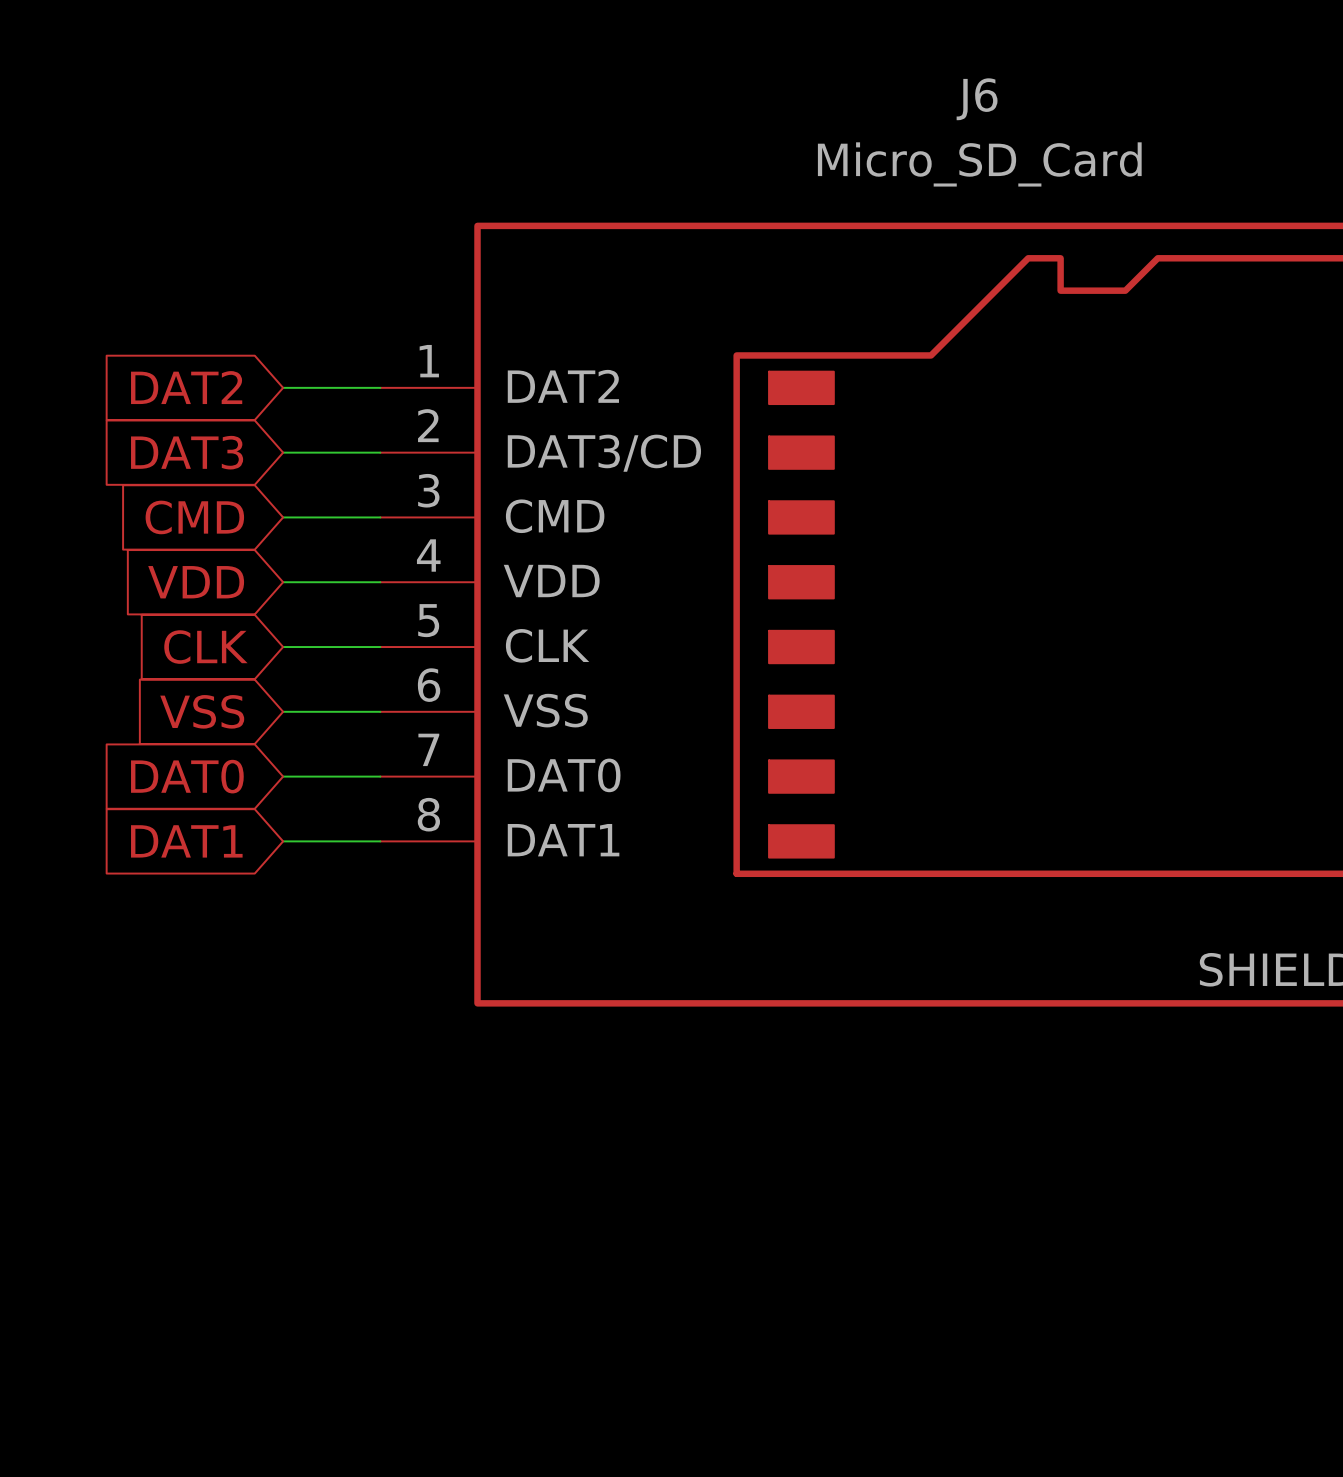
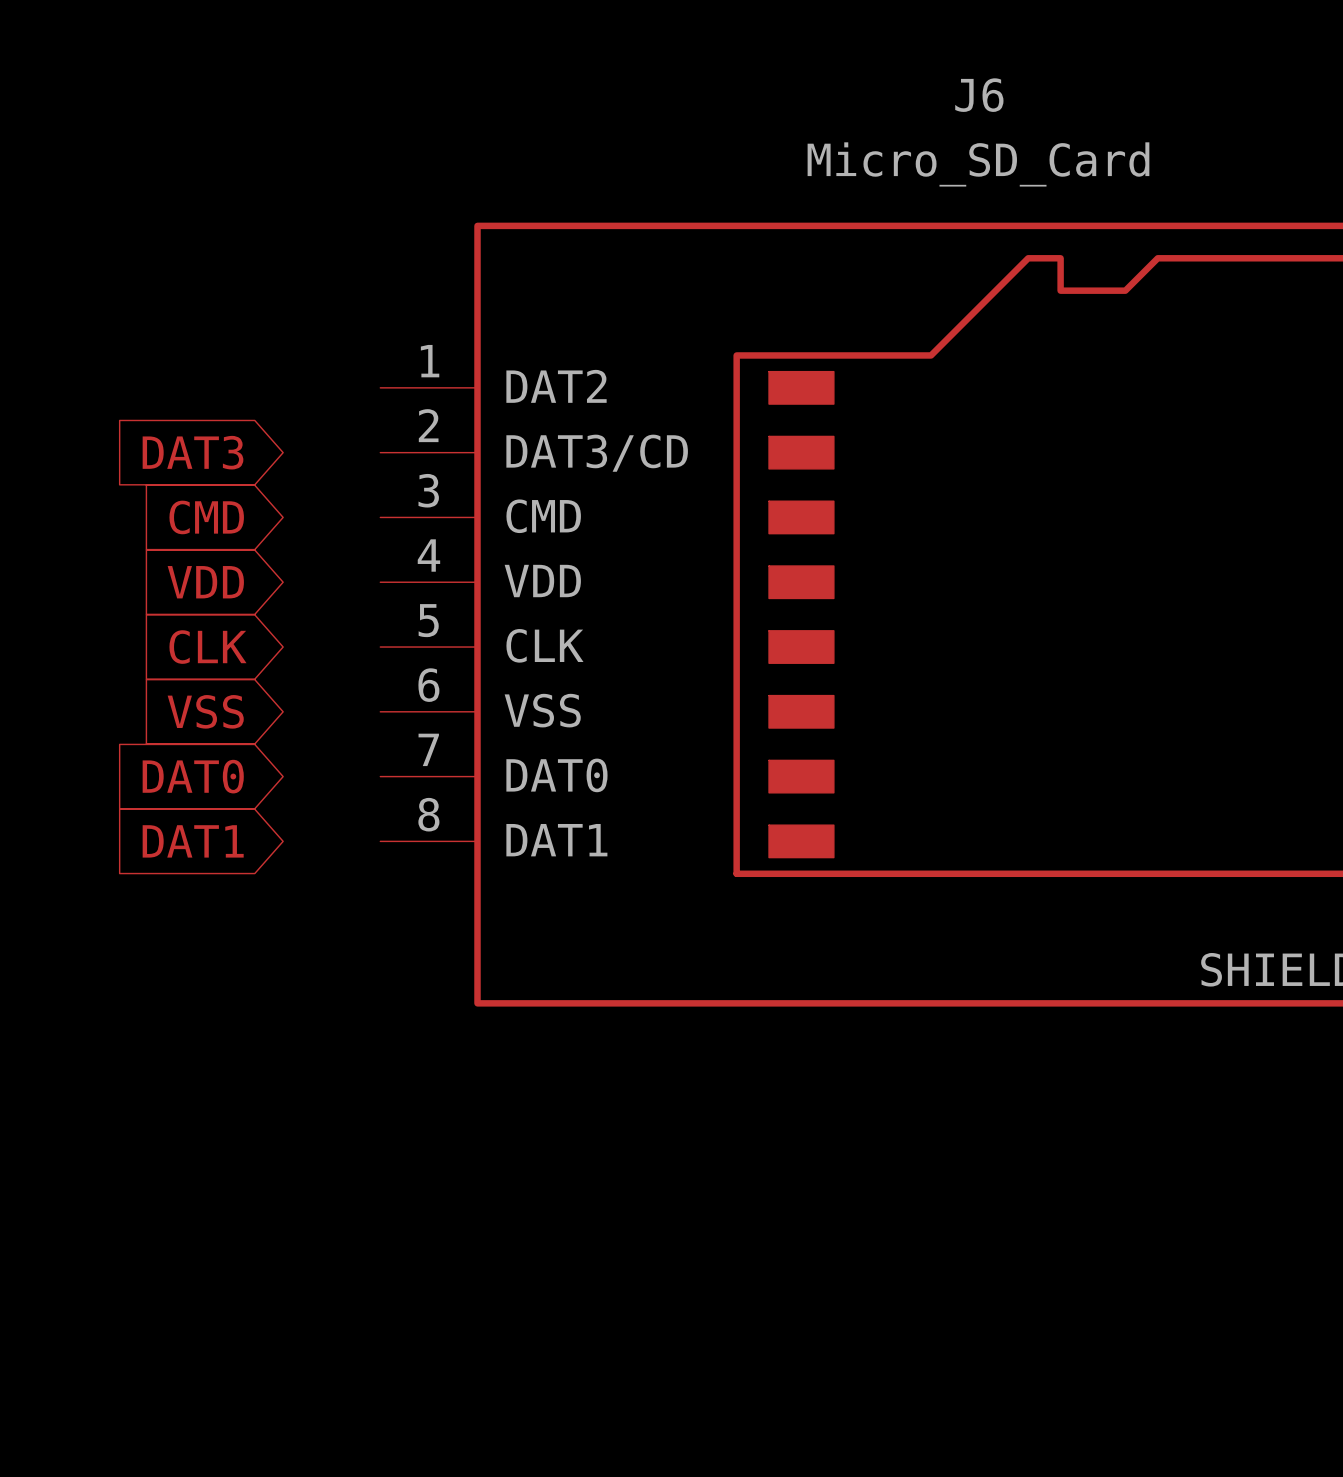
global label: DAT2 (186, 387) -> none
wire: (283, 387) (380, 387) -> none
wire: (283, 452) (380, 452) -> none
wire: (283, 517) (380, 517) -> none
wire: (283, 582) (380, 582) -> none
wire: (283, 647) (380, 647) -> none
wire: (283, 711) (380, 711) -> none
wire: (283, 776) (380, 776) -> none
wire: (283, 841) (380, 841) -> none

